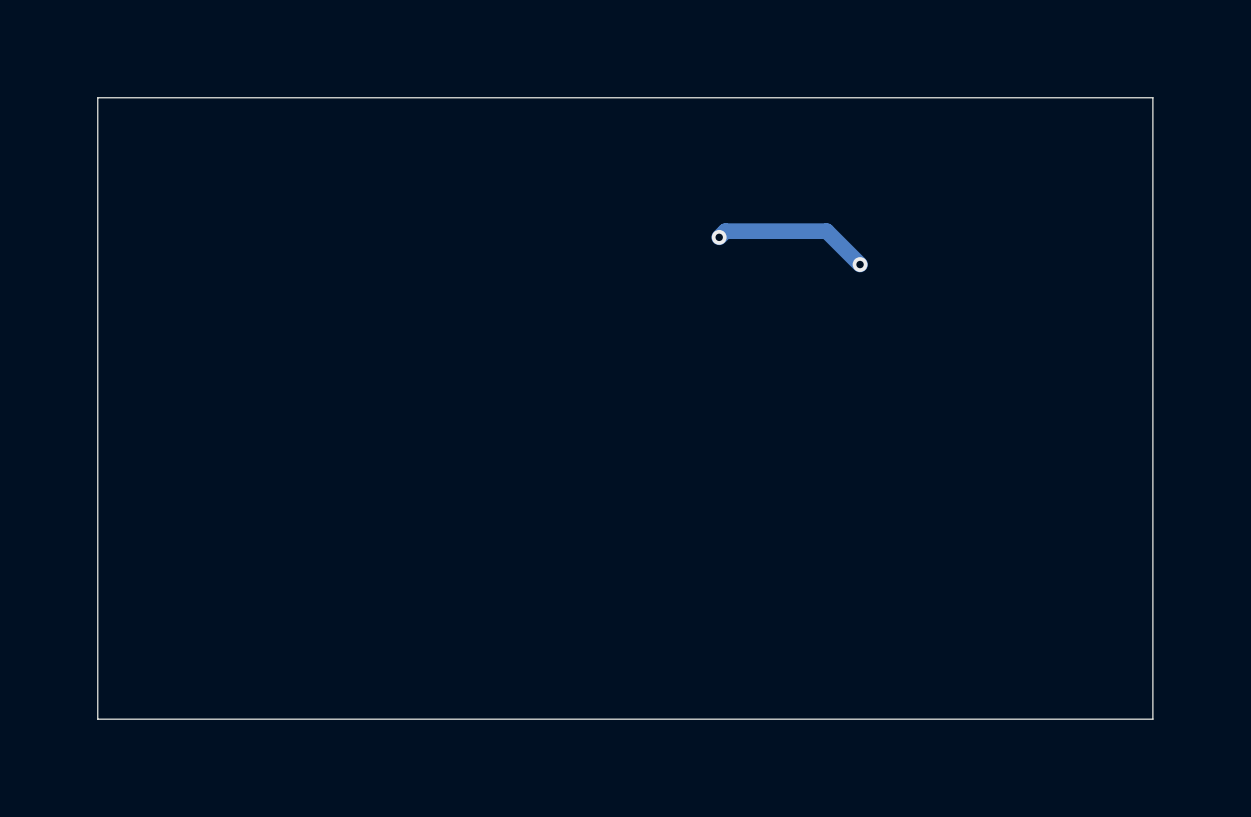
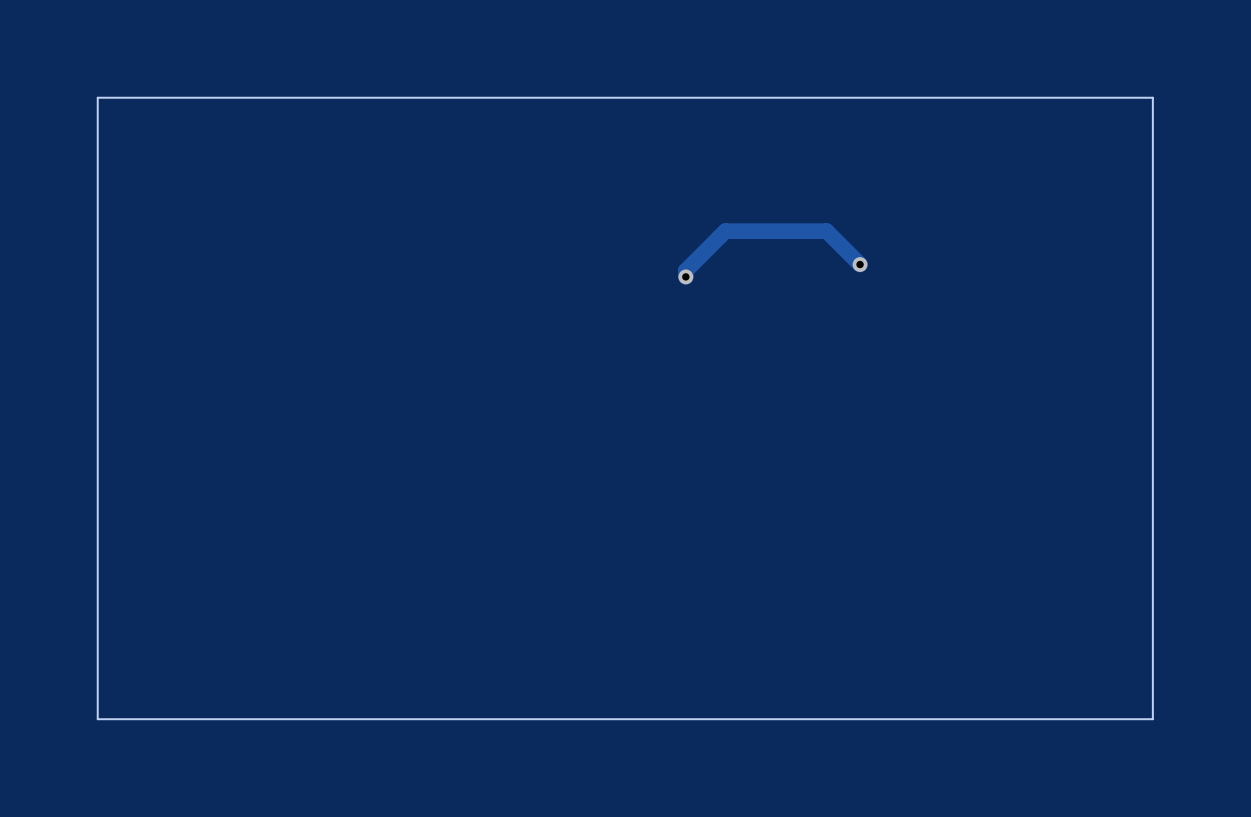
track: none -> (719, 237) (685, 270) (685, 276)
via position: (719, 237) -> (685, 276)

